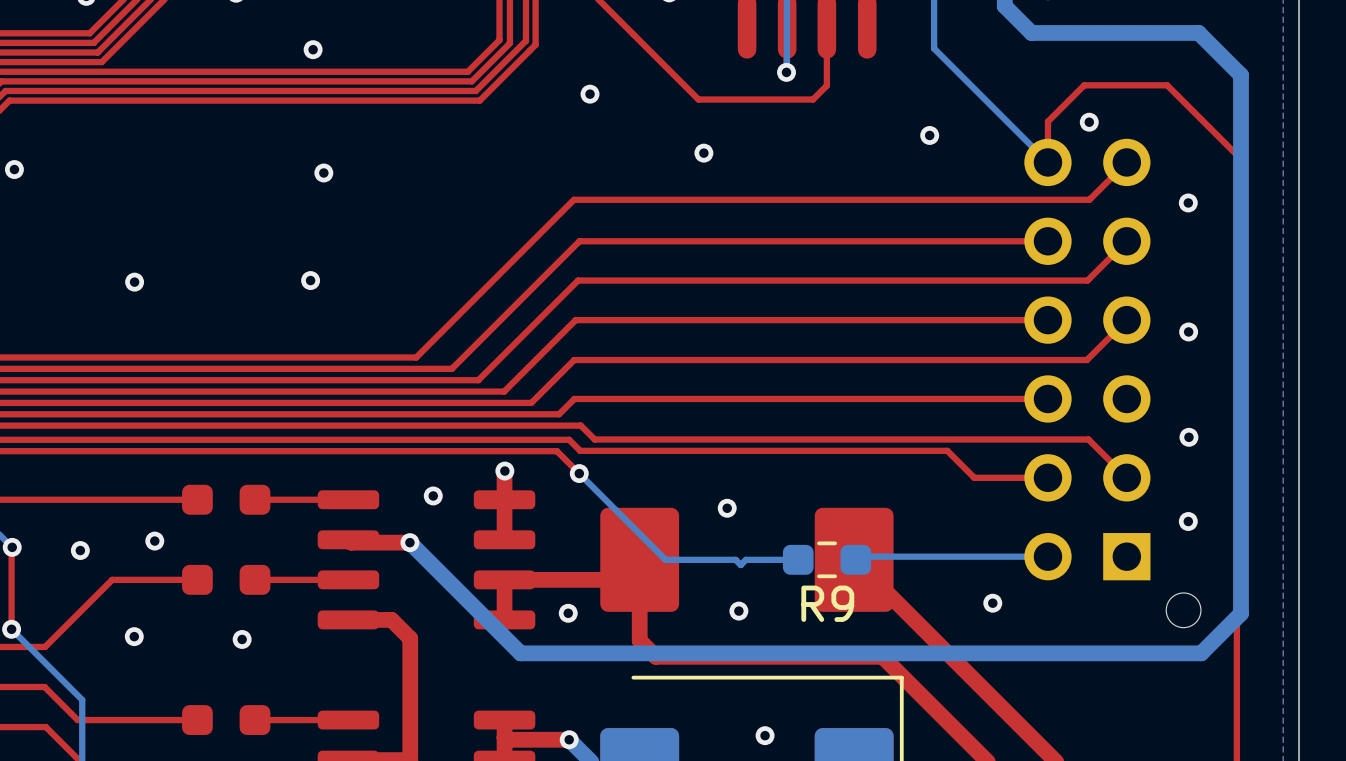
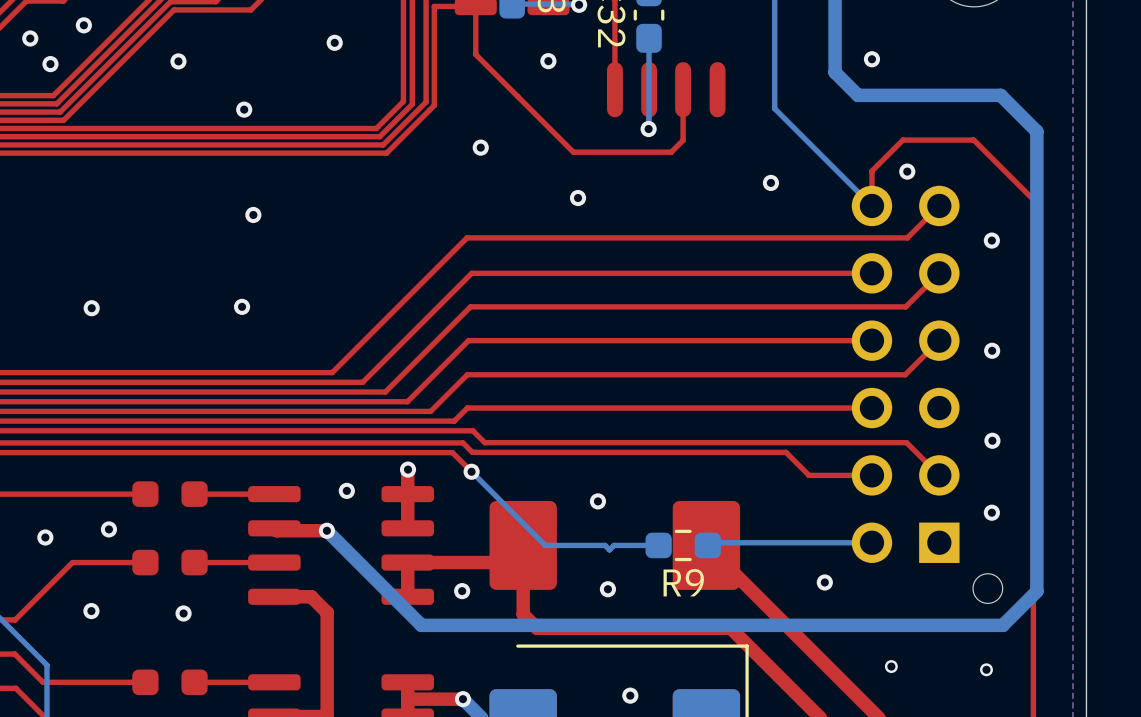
via: none -> (891, 666)
via: none -> (986, 669)

